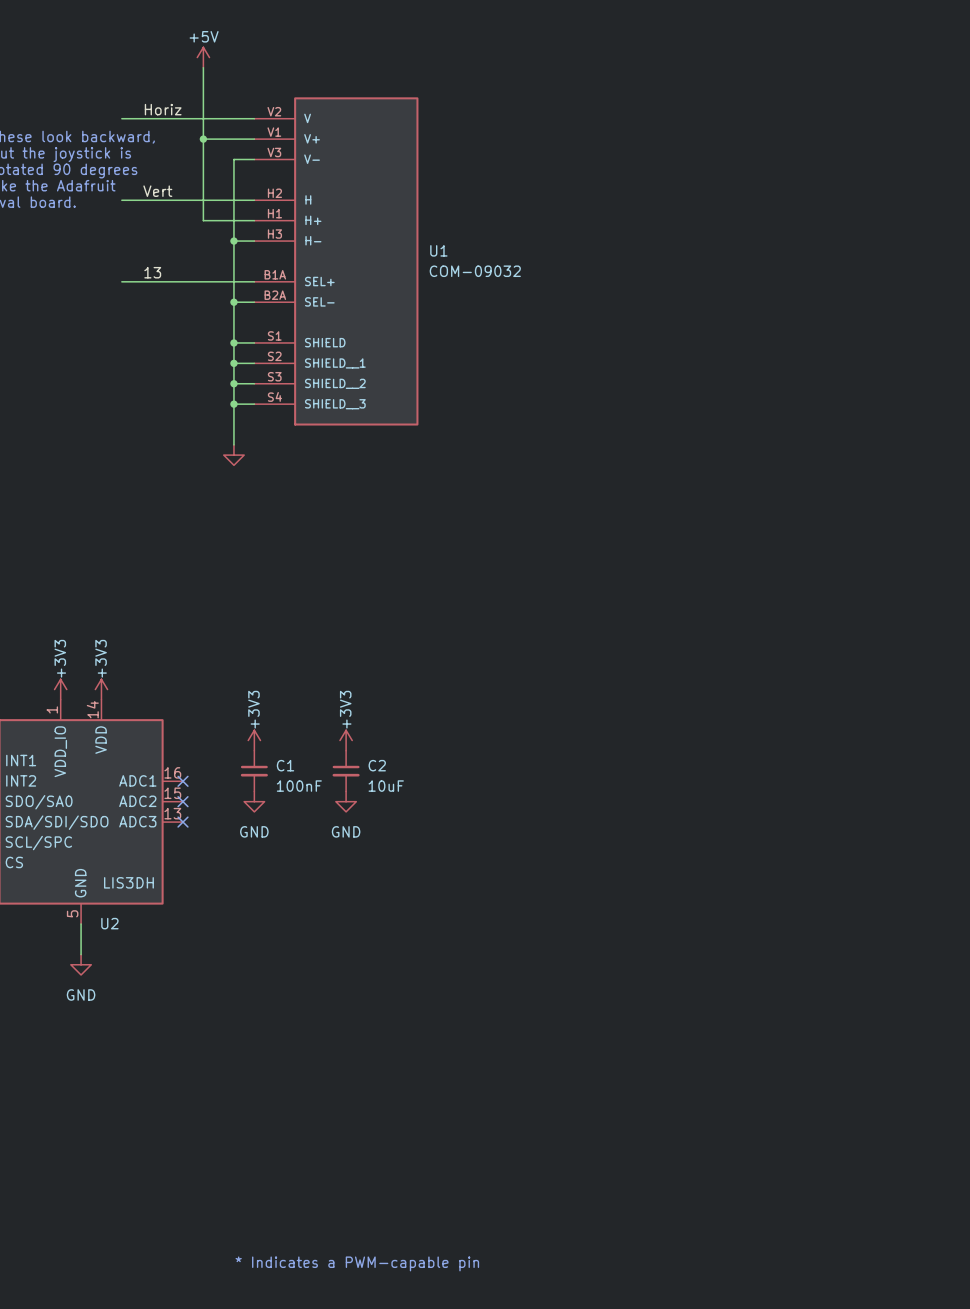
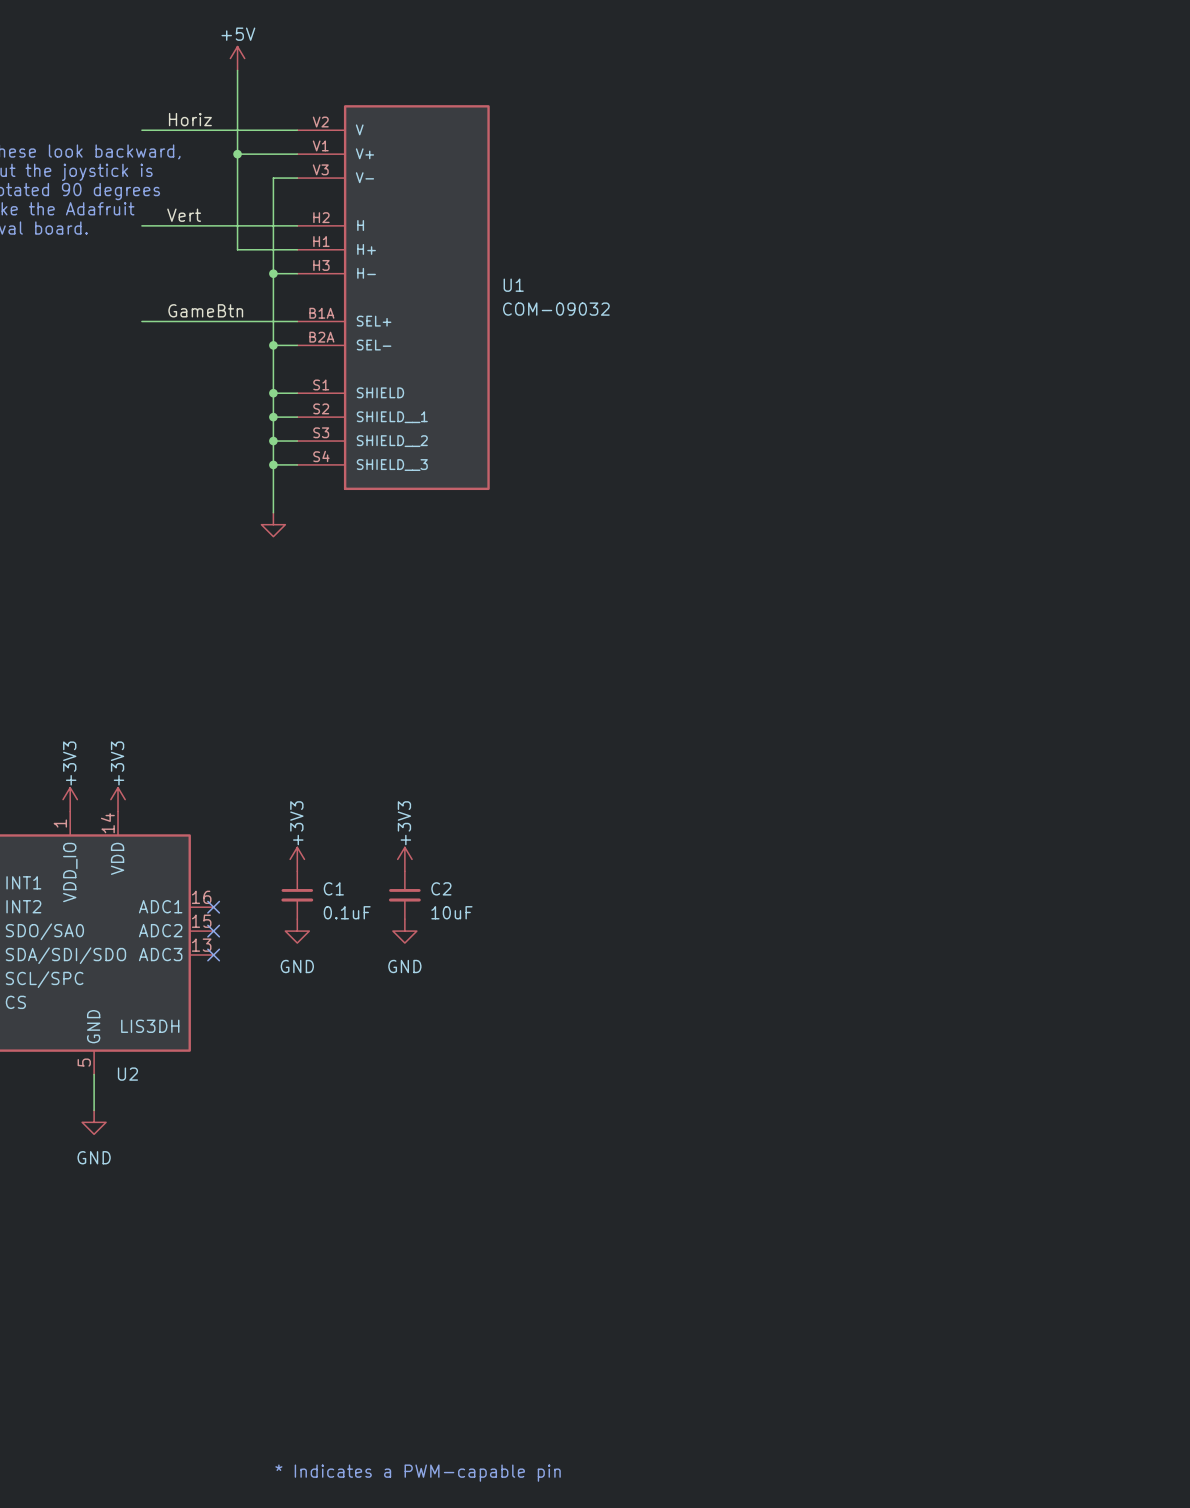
label: 13 (152, 272) -> GameBtn (205, 310)
C1 value: 100nF (299, 786) -> 0.1uF (347, 912)

